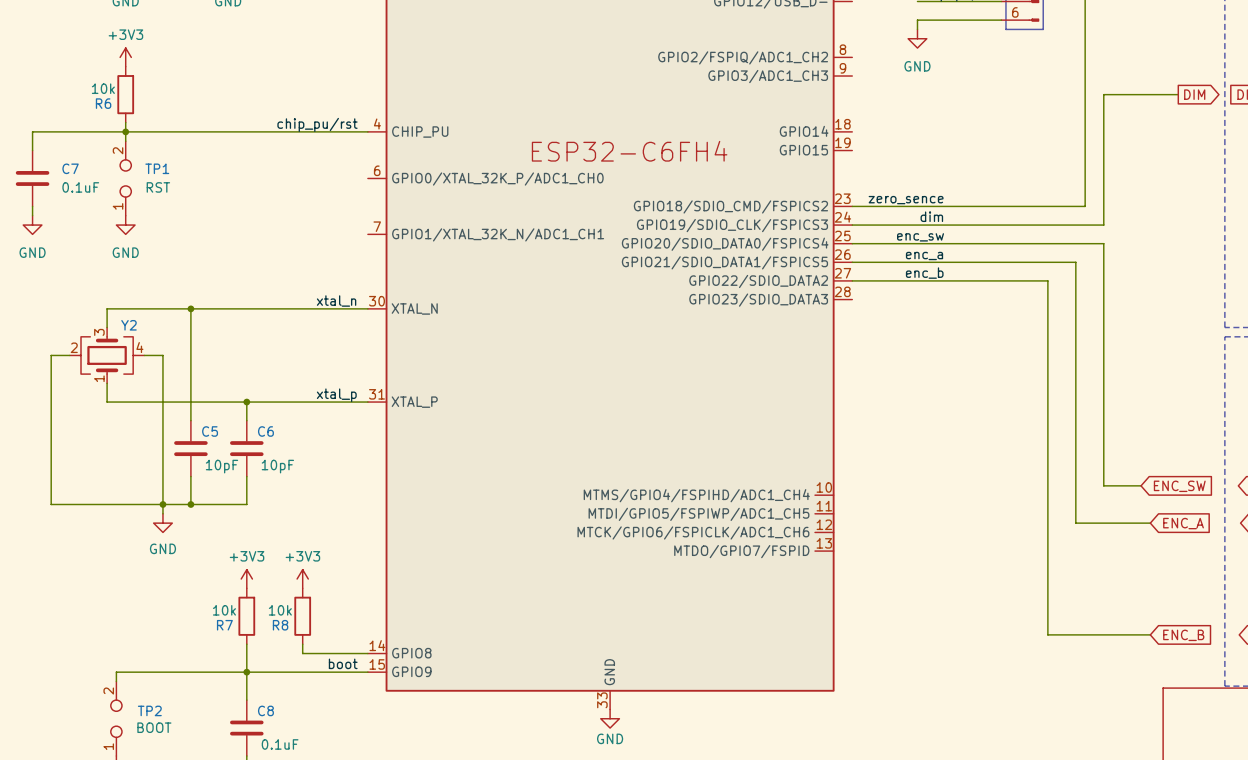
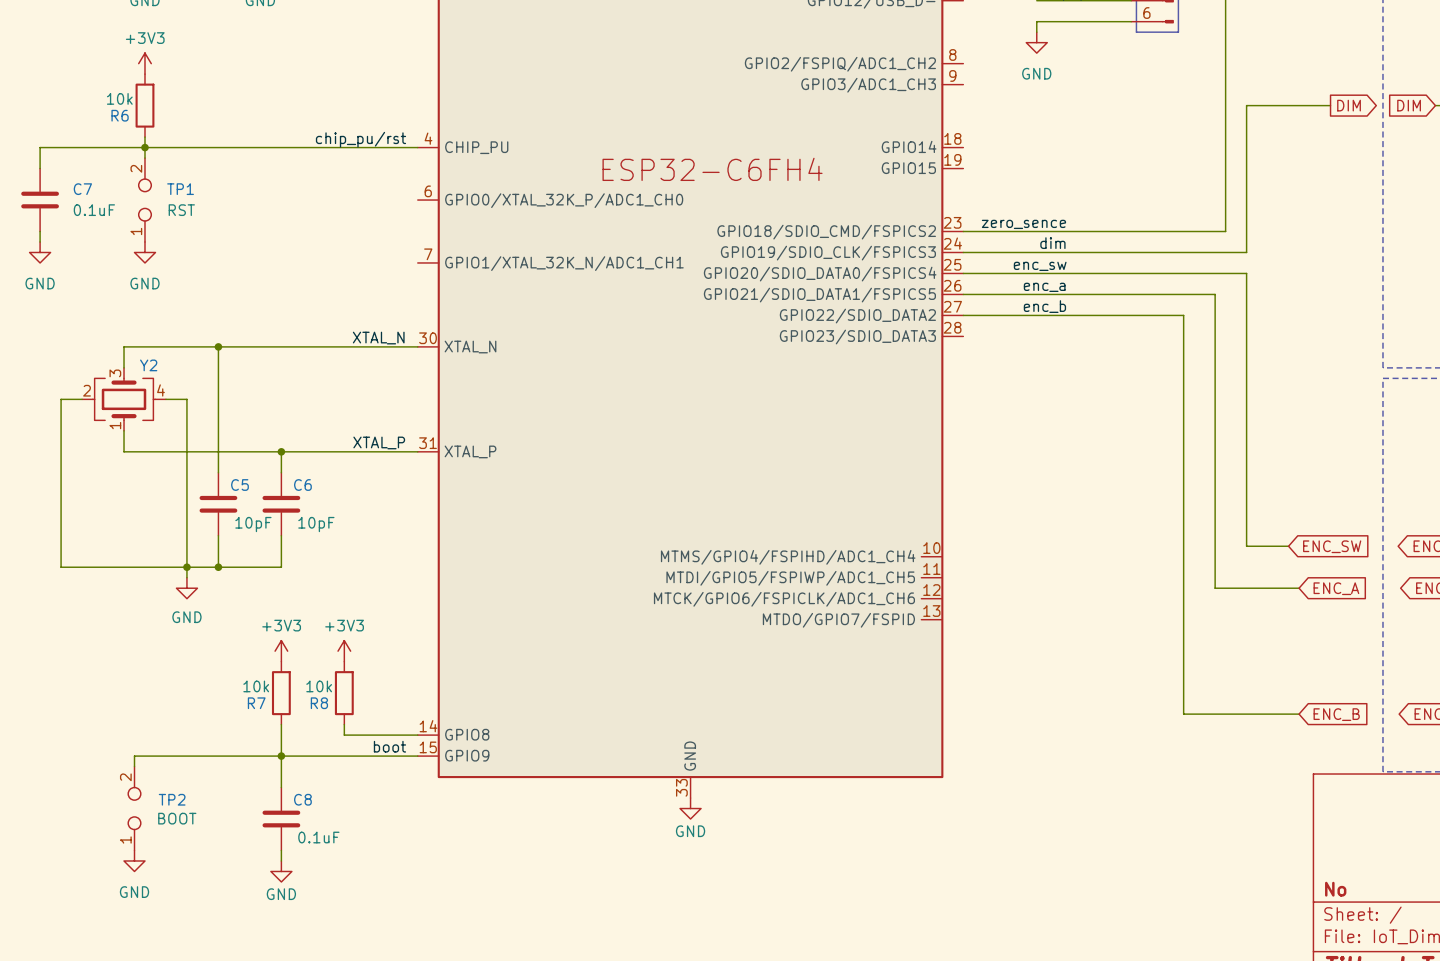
label: xtal_n (336, 301) -> XTAL_N (378, 338)
label: xtal_p (336, 395) -> XTAL_P (379, 442)

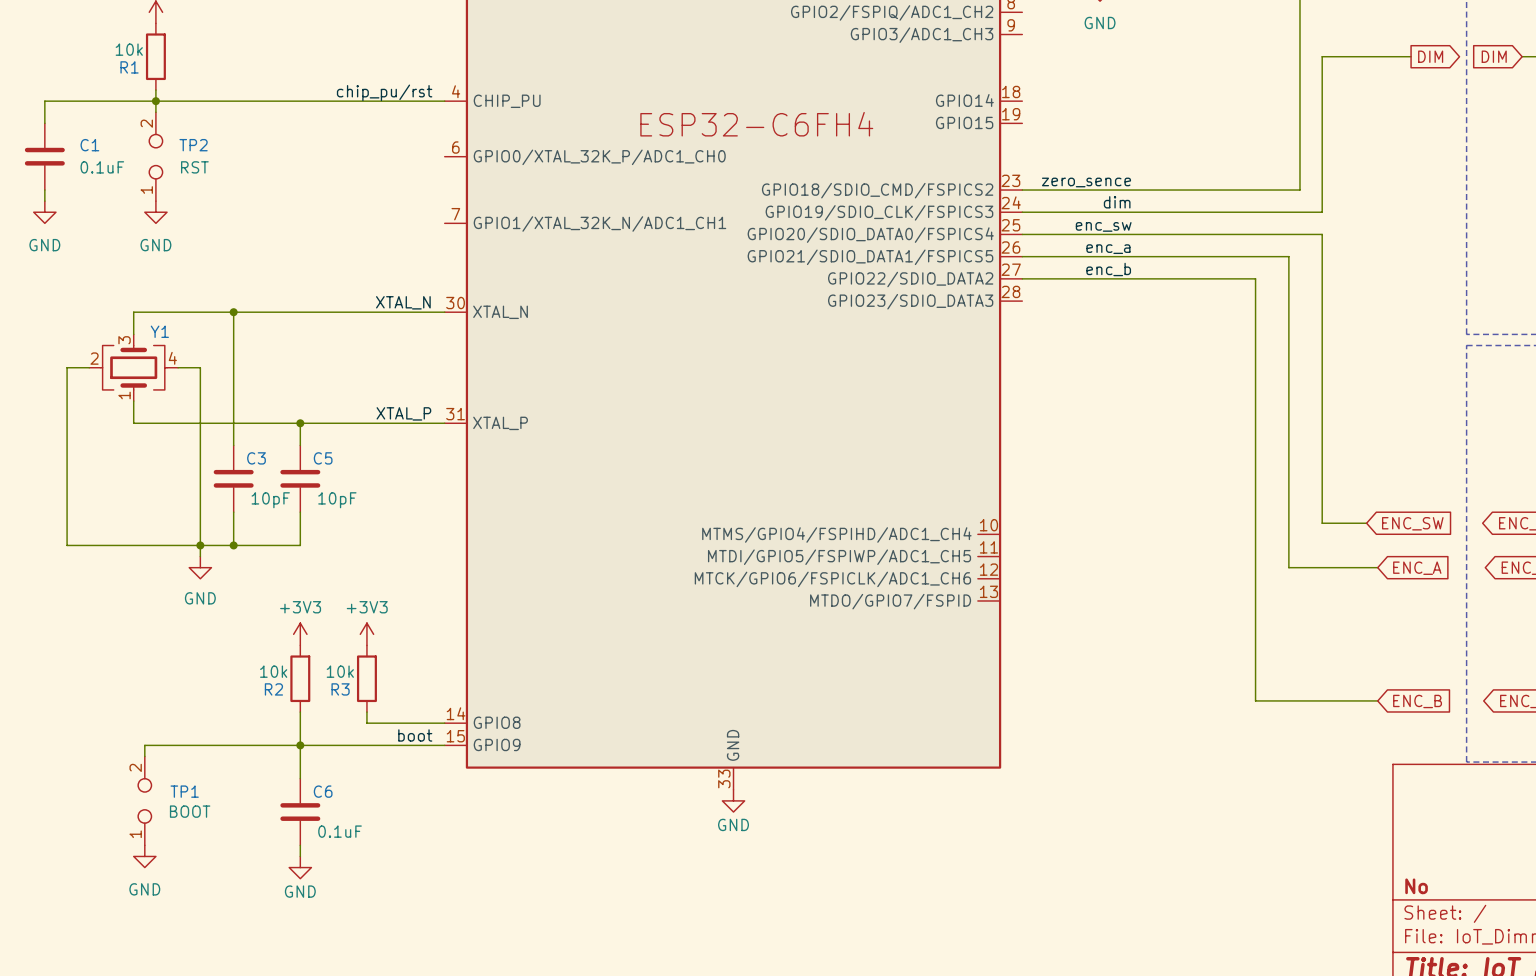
R6 name: R6 (120, 115) -> R1 (129, 67)
C7 name: C7 (82, 189) -> C1 (89, 145)
TP1 name: TP1 (180, 189) -> TP2 (193, 145)
Y2 name: Y2 (148, 365) -> Y1 (159, 331)
C5 name: C5 (239, 485) -> C3 (256, 458)
C6 name: C6 (302, 485) -> C5 (323, 458)
R7 name: R7 (256, 703) -> R2 (273, 689)
R8 name: R8 (319, 703) -> R3 (340, 689)
TP2 name: TP2 (172, 799) -> TP1 (184, 791)
C8 name: C8 (302, 799) -> C6 (323, 791)

